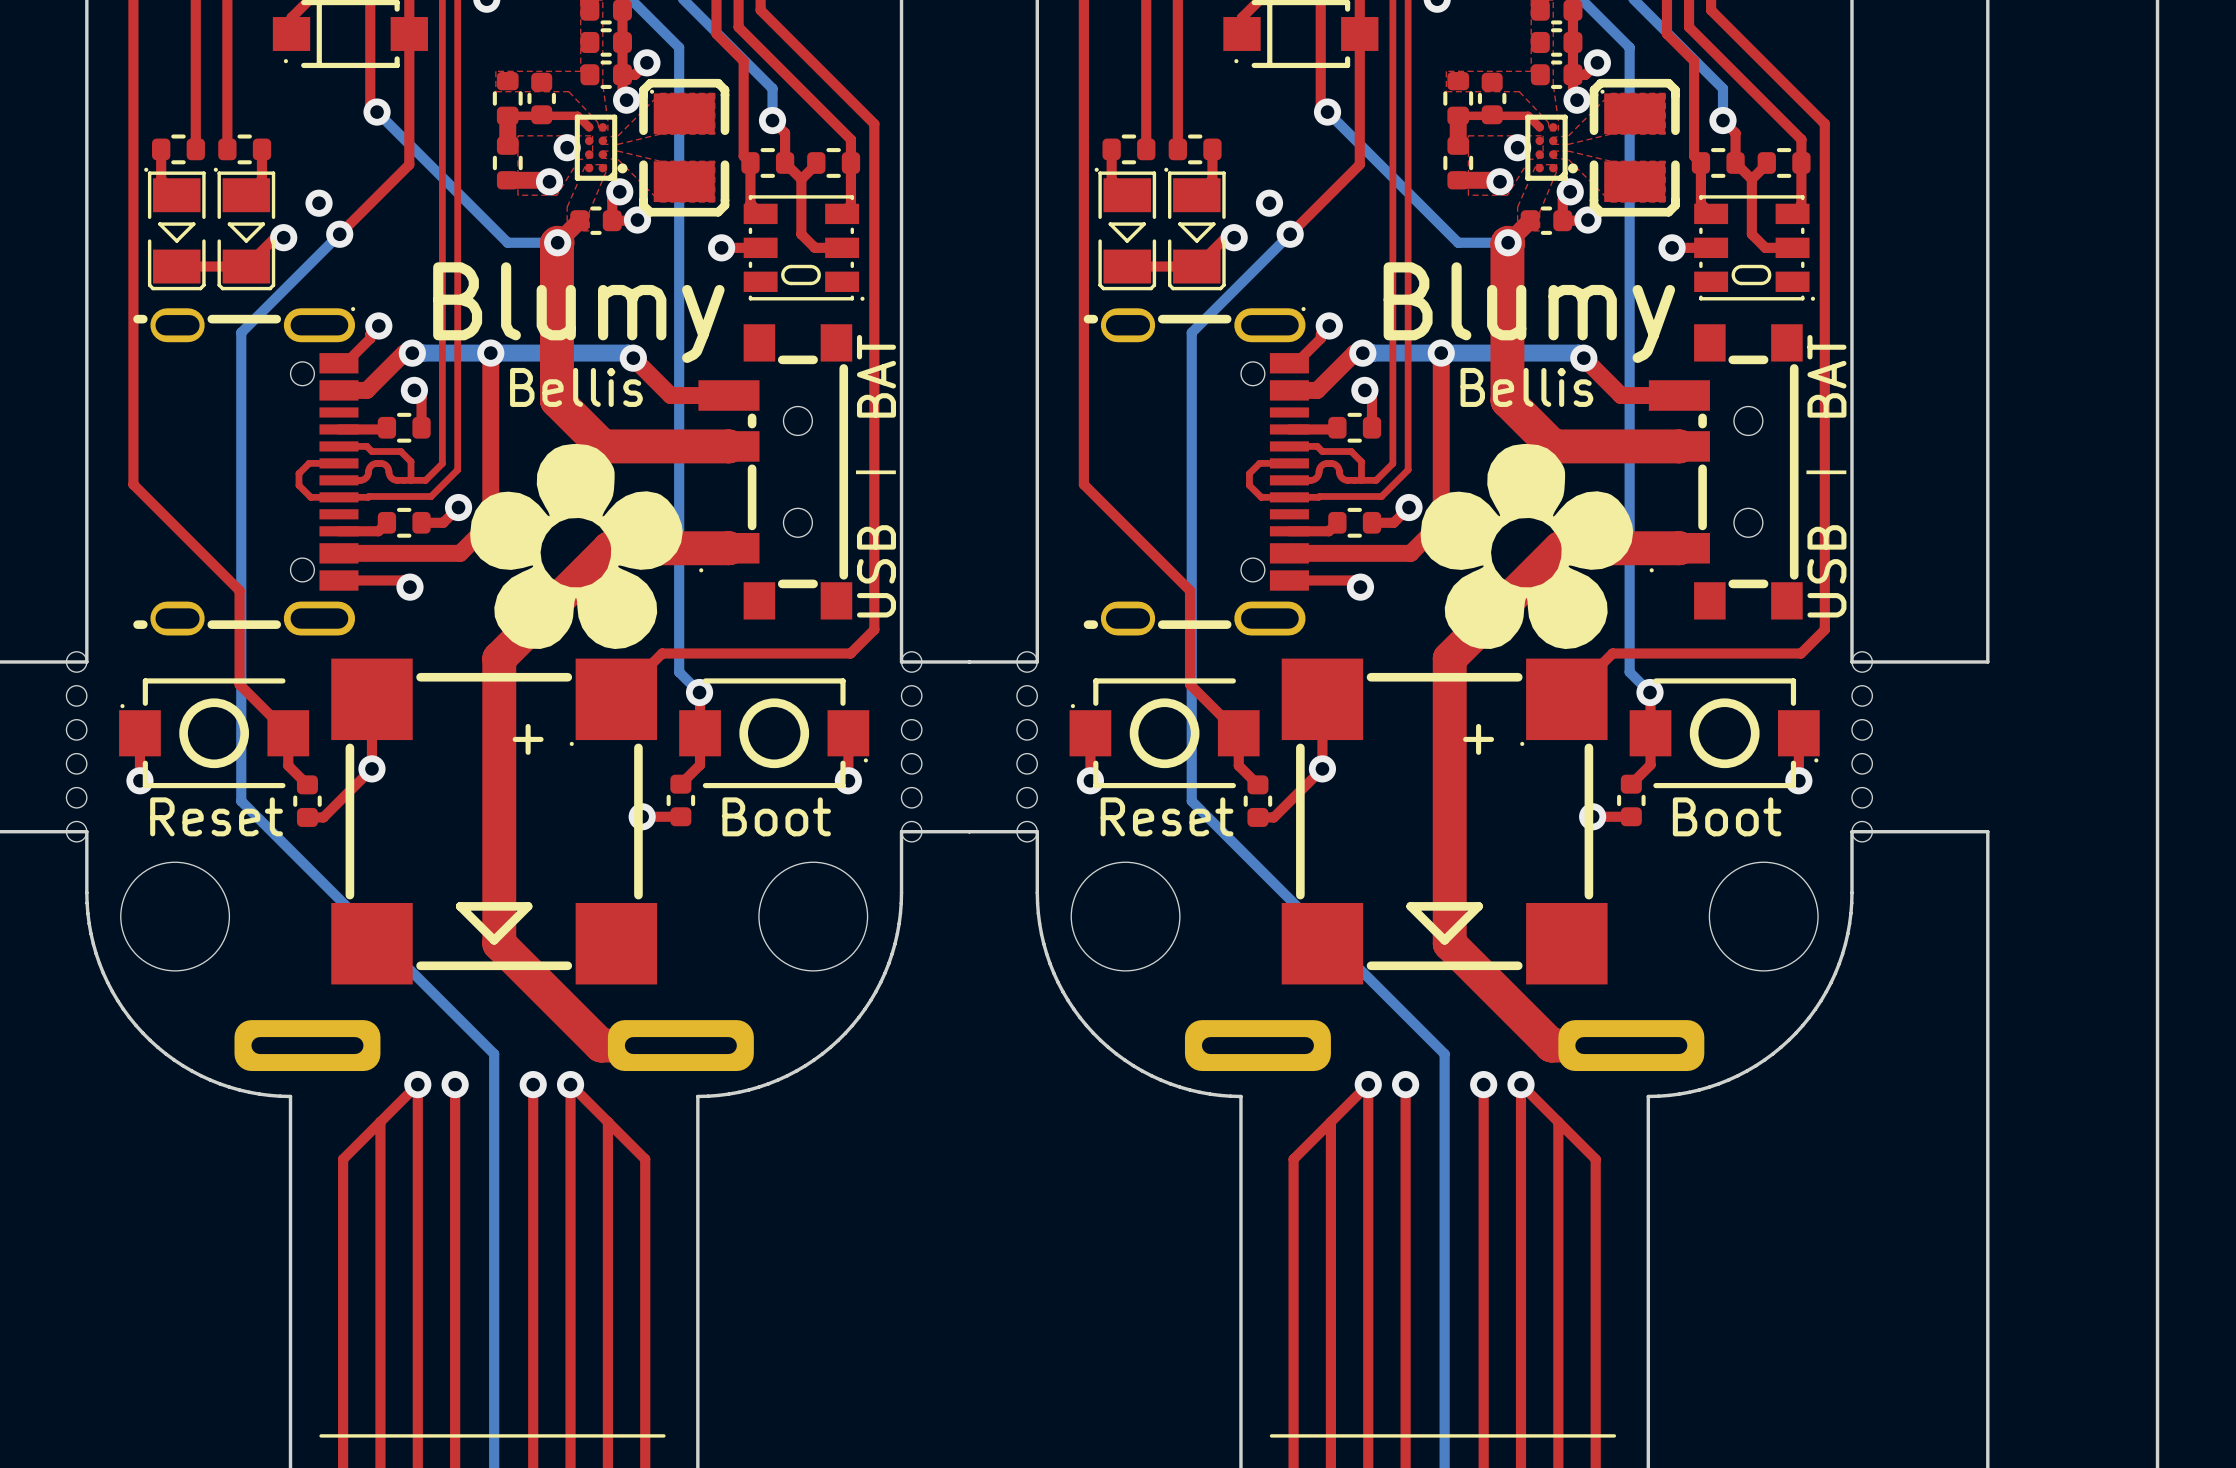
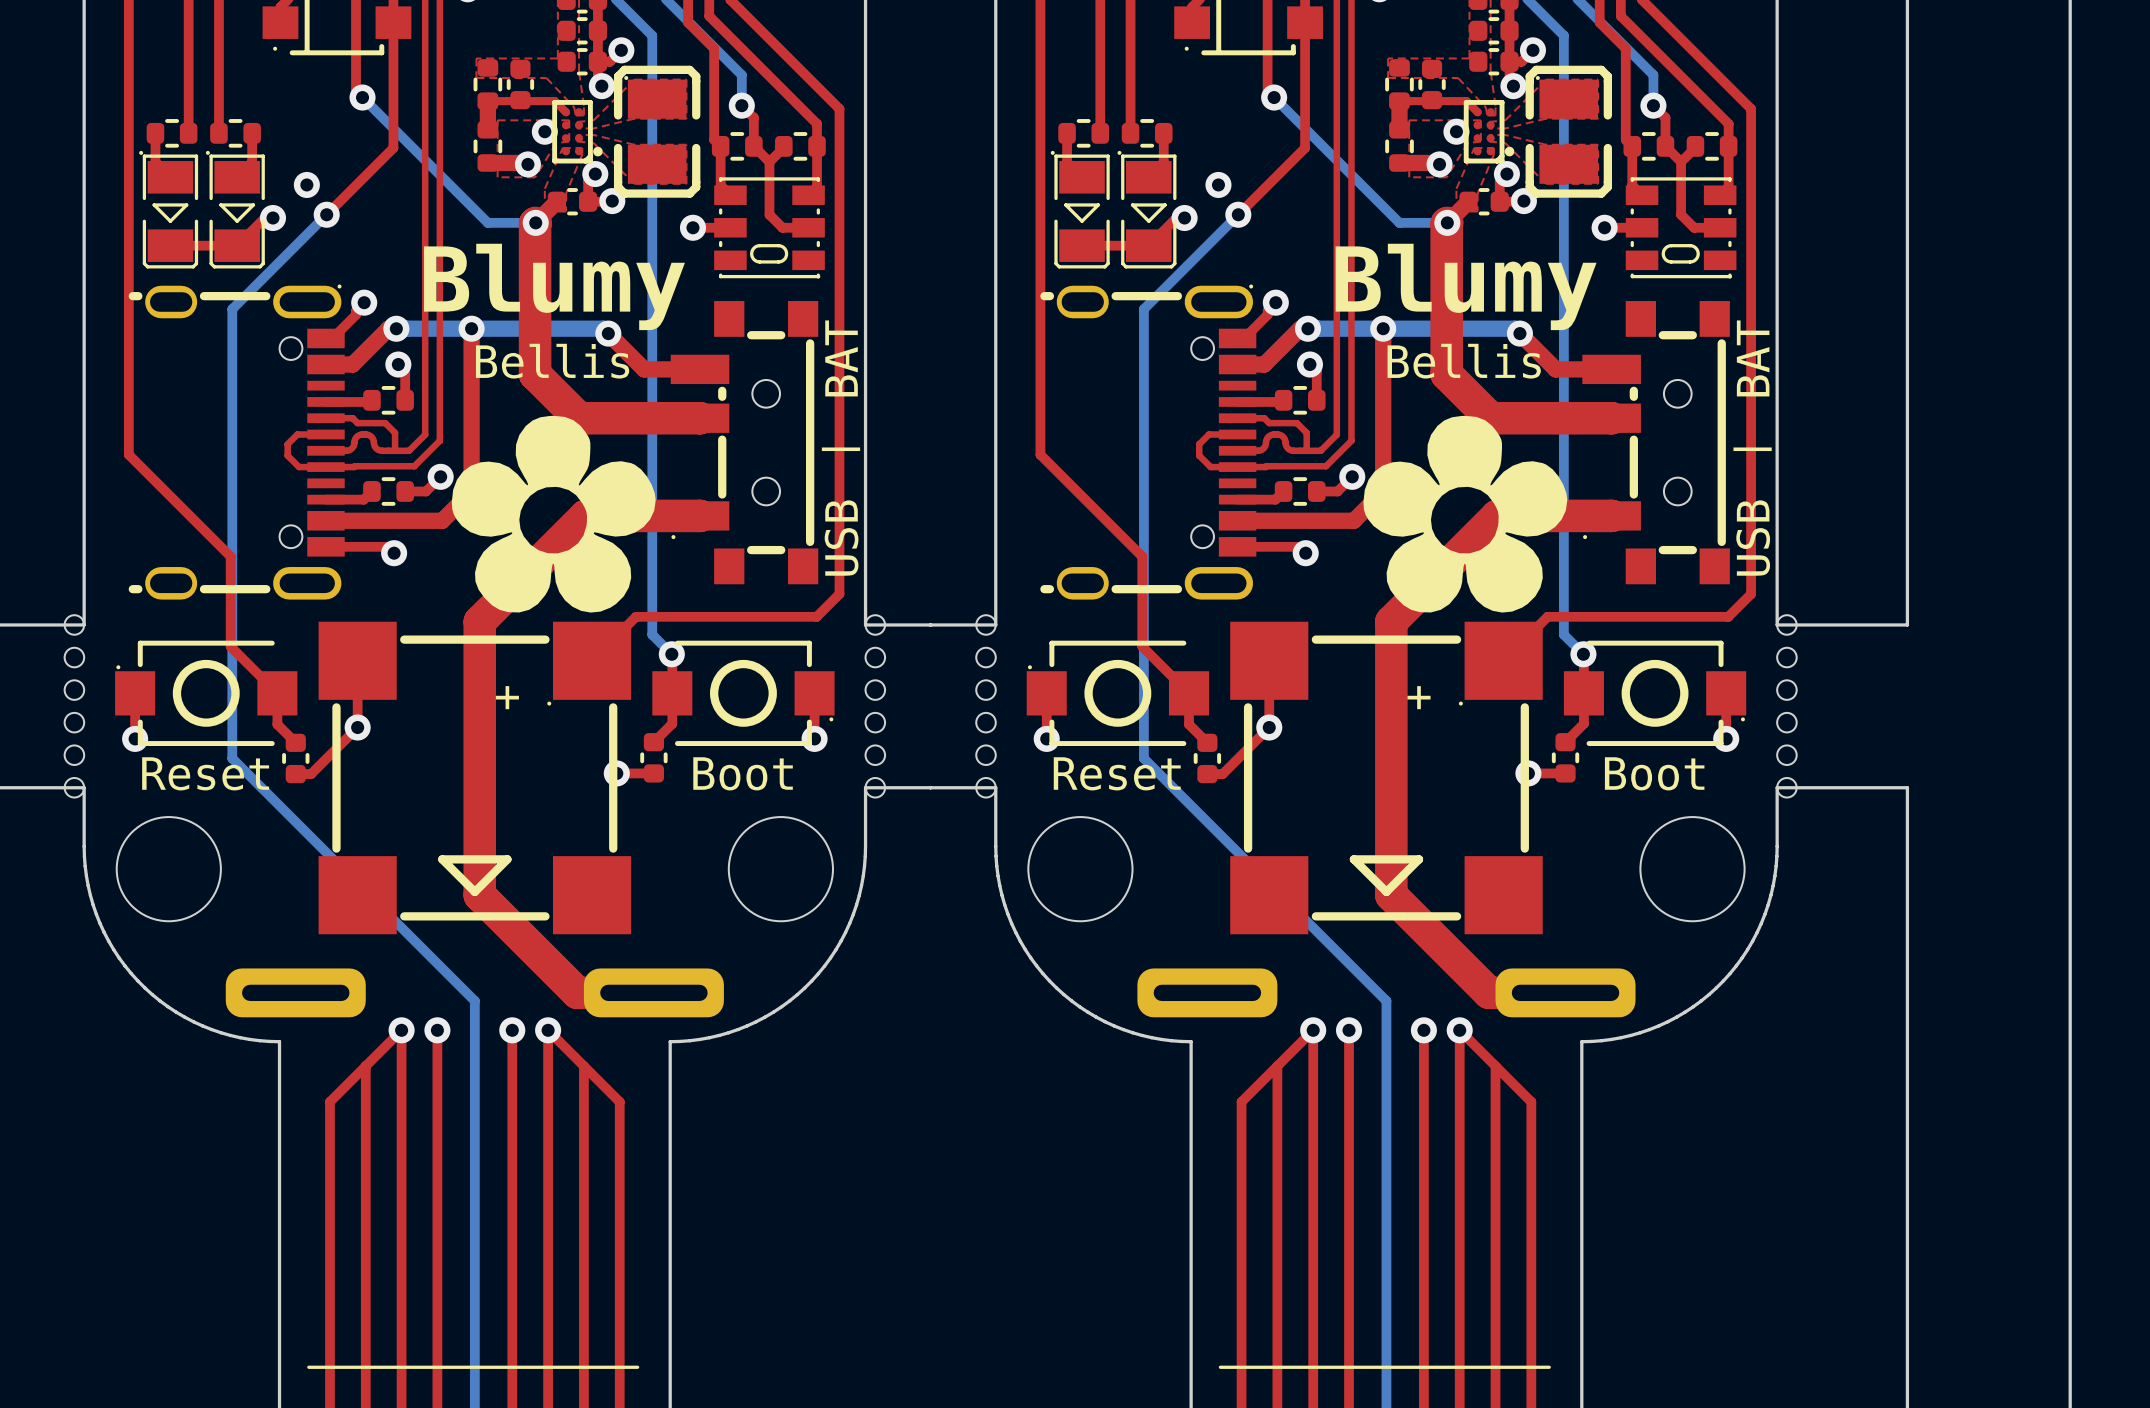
part footprint: [743, 195, 865, 301] -> [714, 177, 825, 279]
part footprint: [1694, 195, 1815, 301] -> [1625, 177, 1737, 279]

